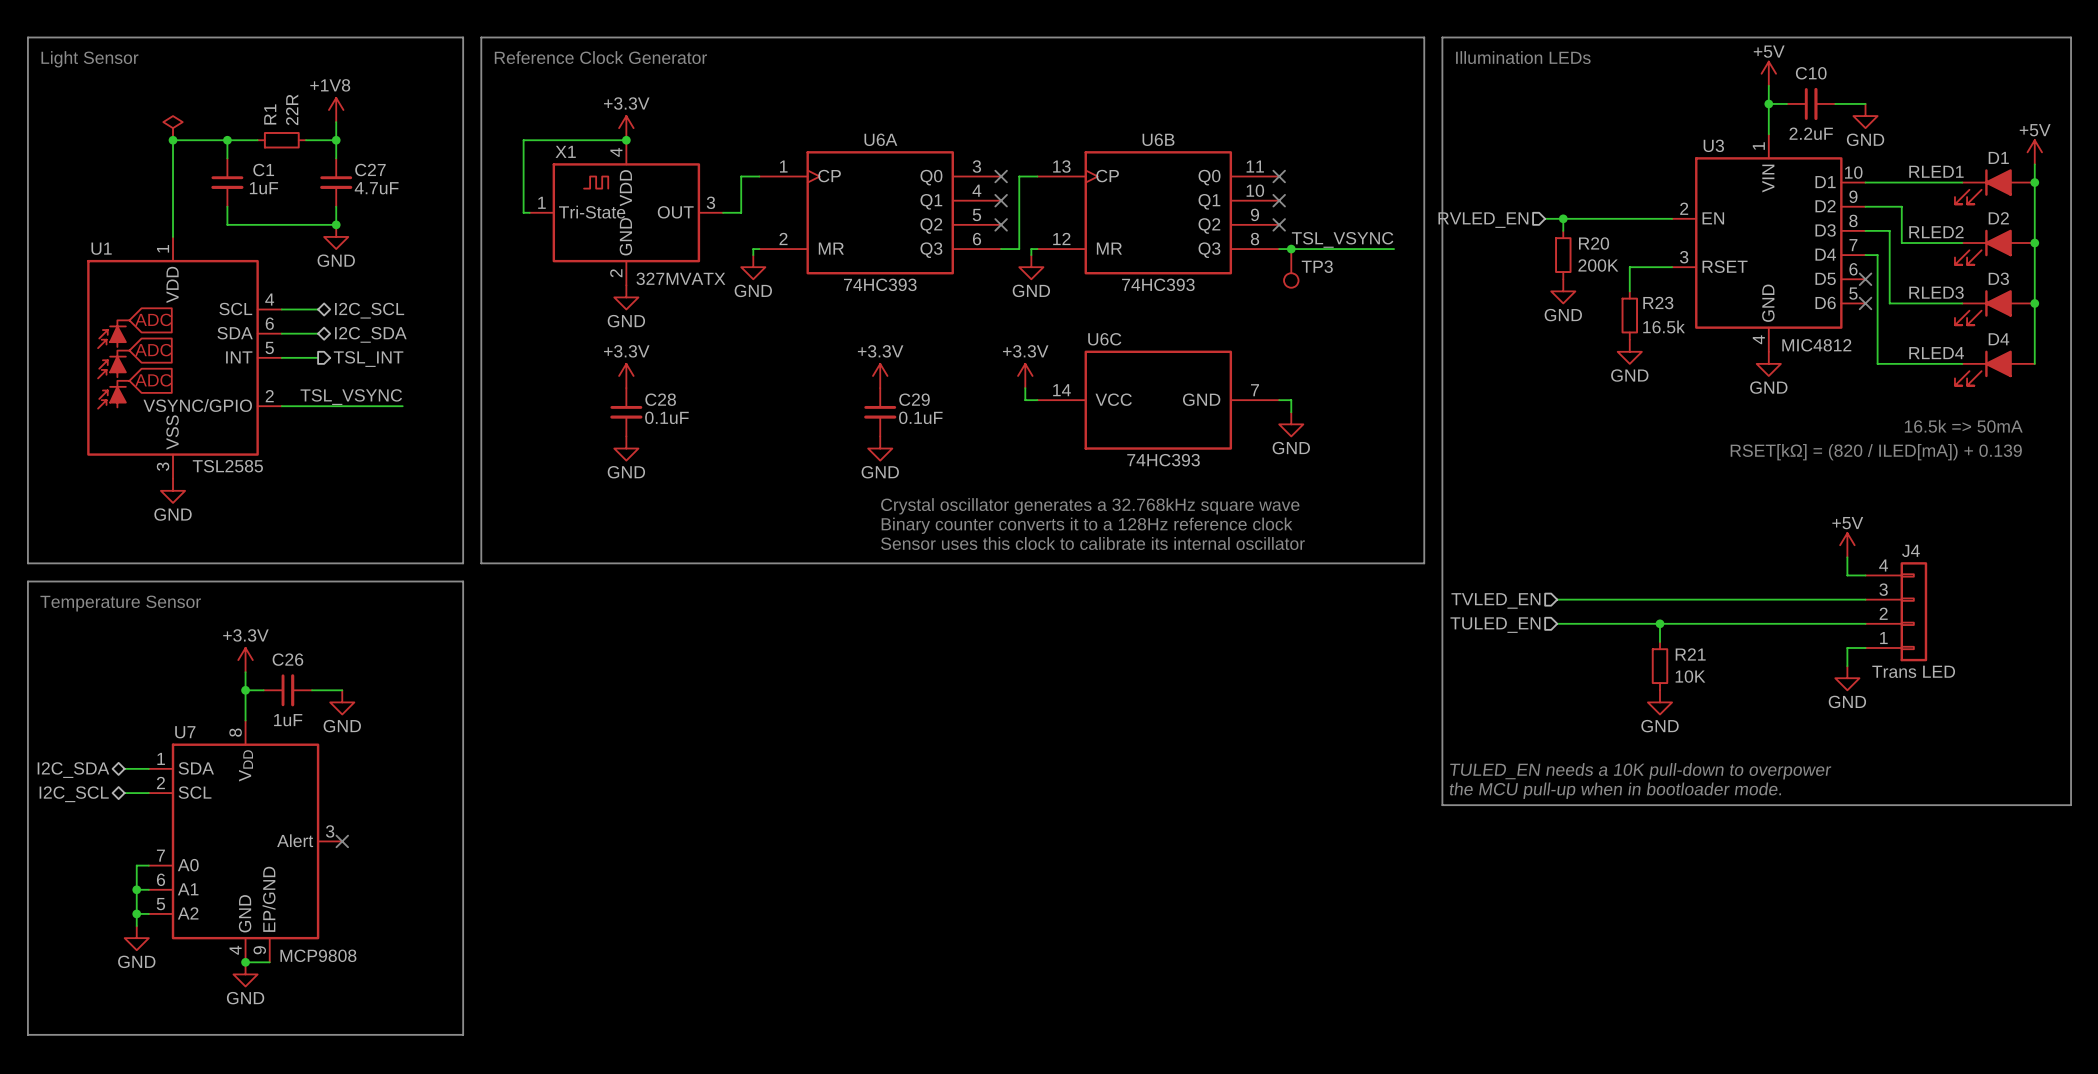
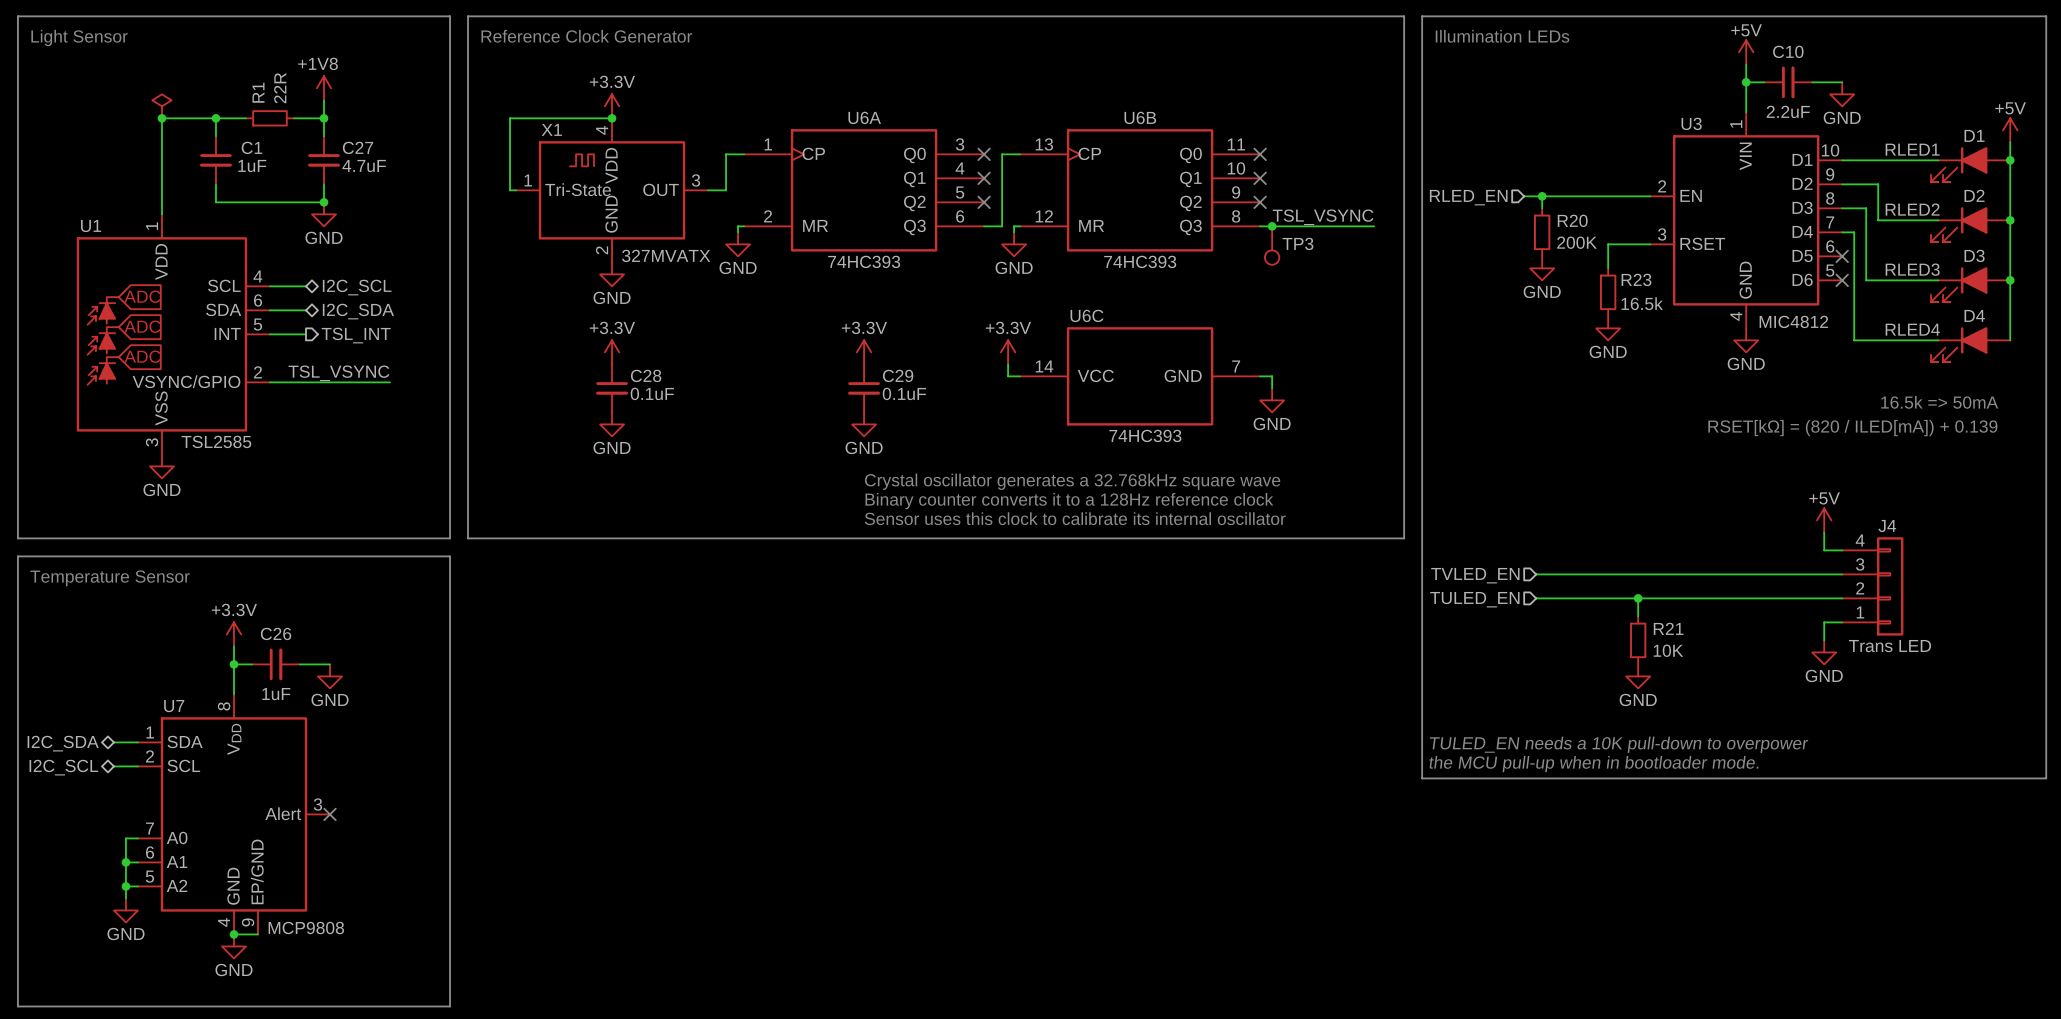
hierarchical label: RVLED_EN (1483, 220) -> RLED_EN (1468, 197)

